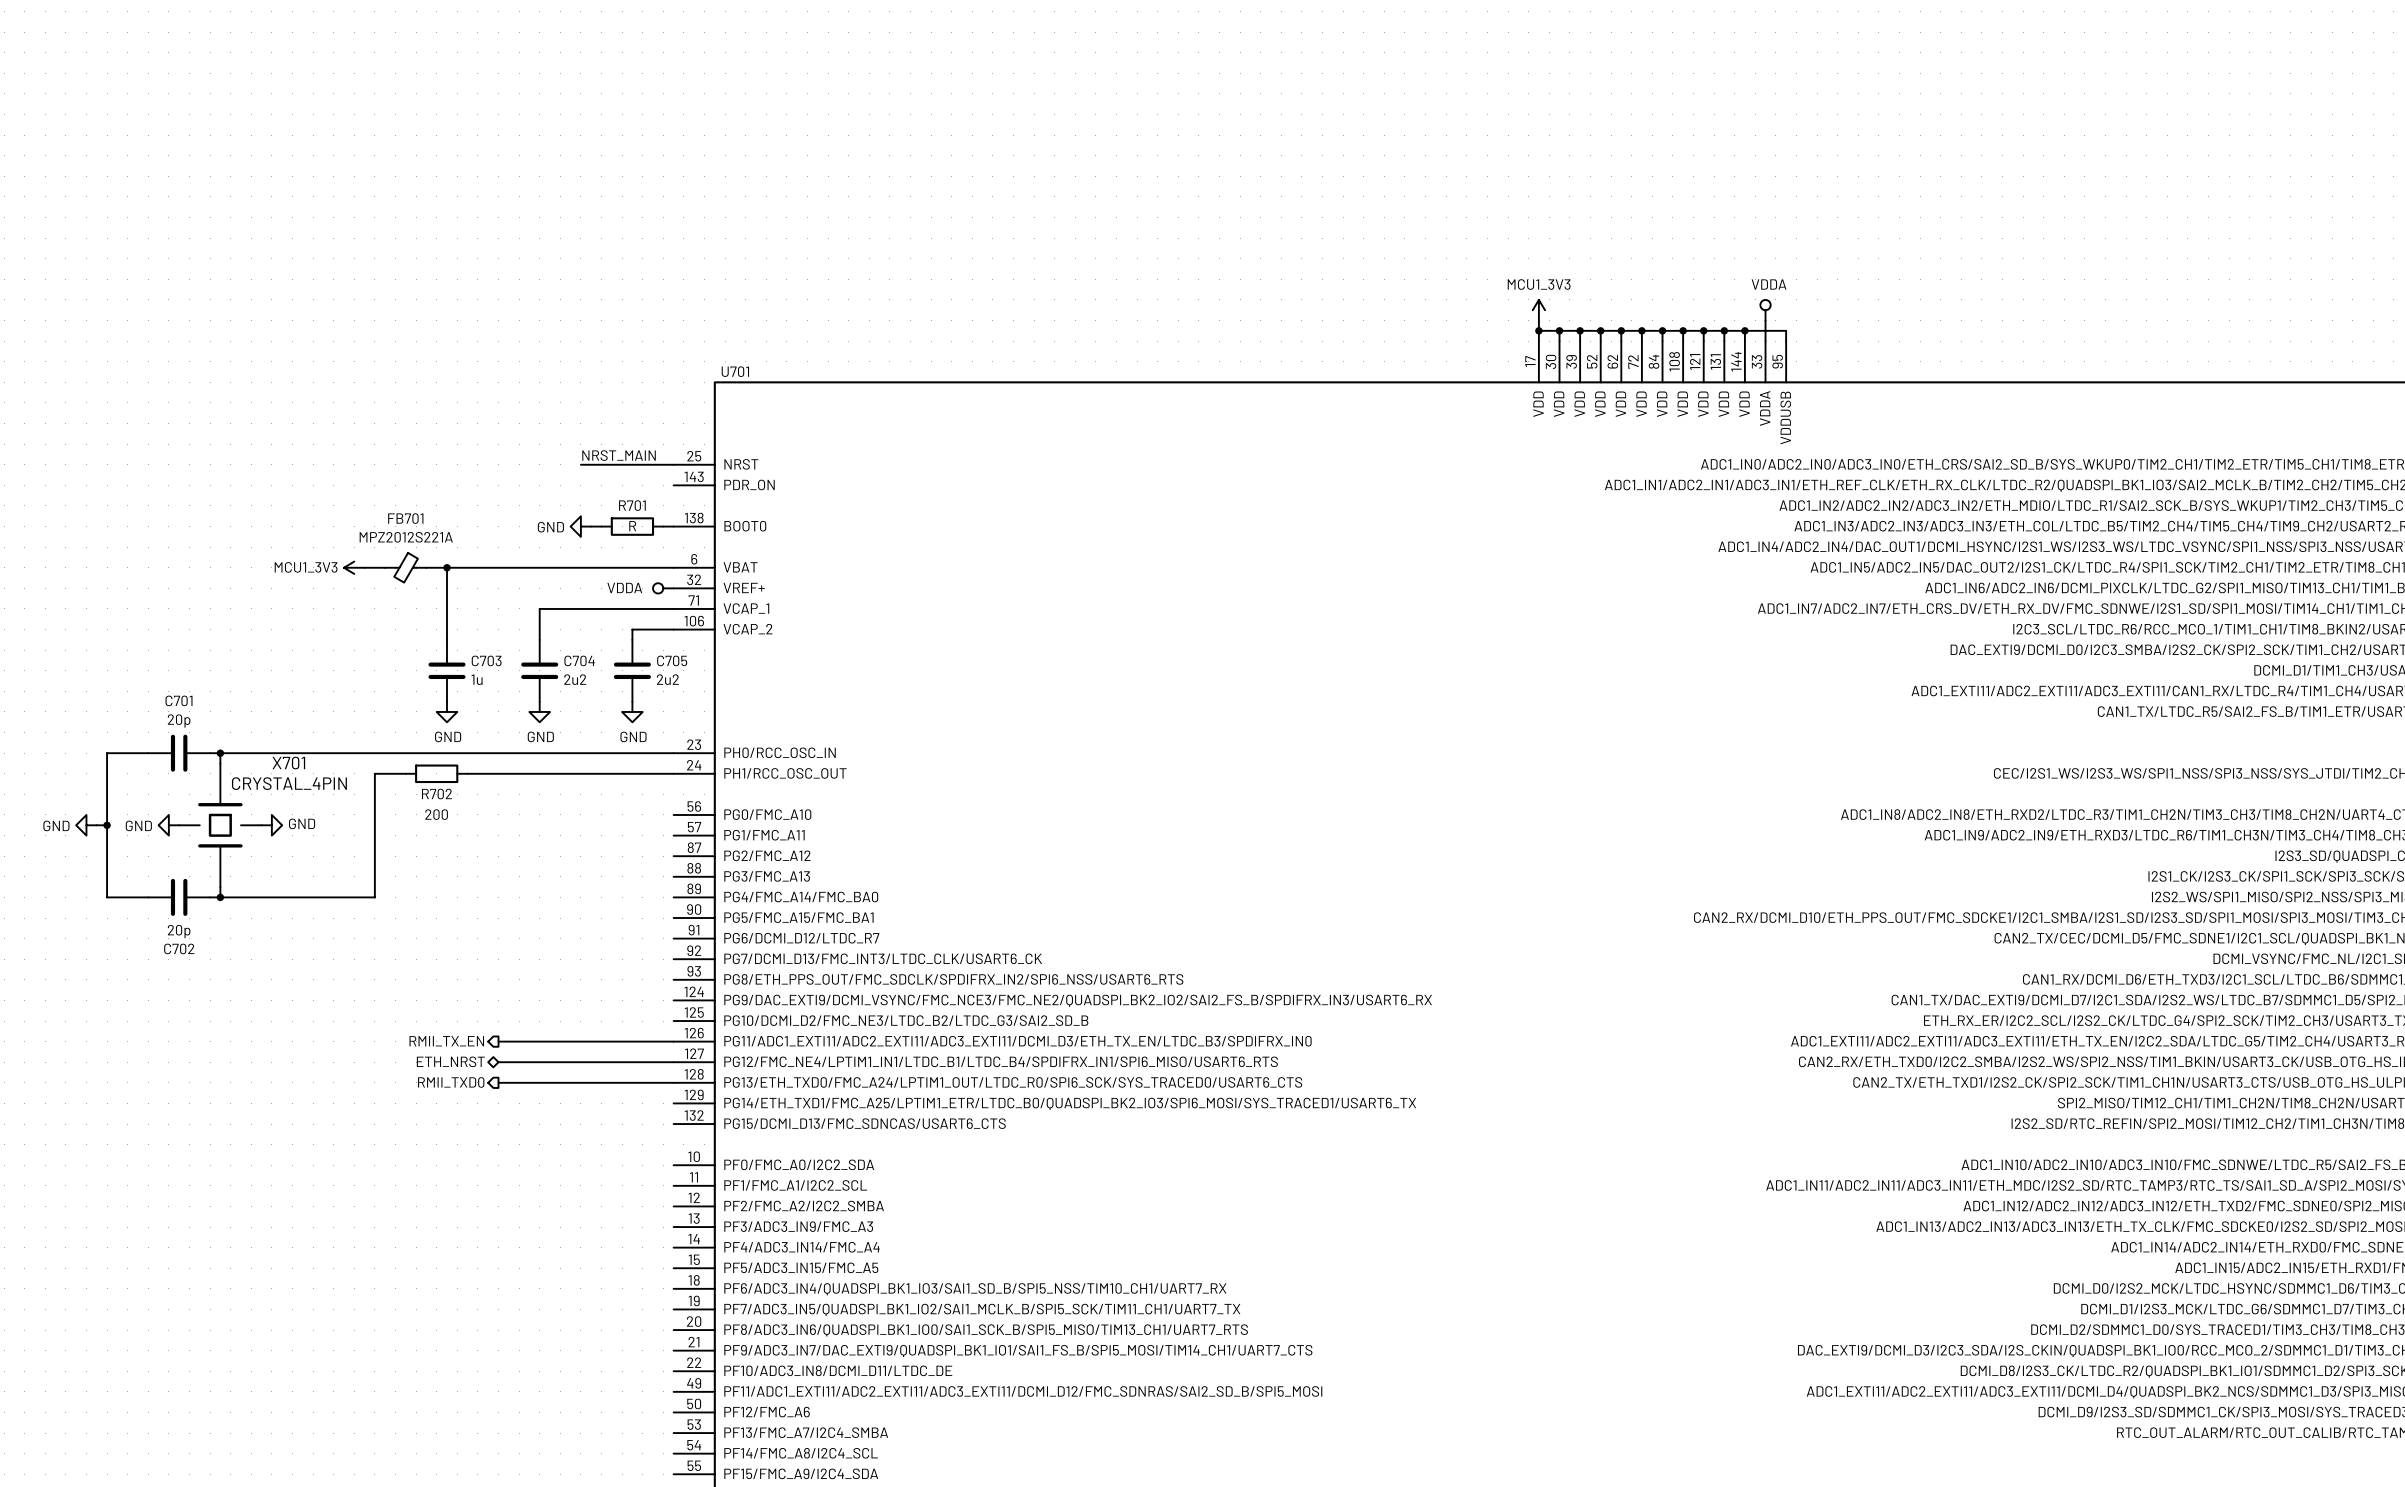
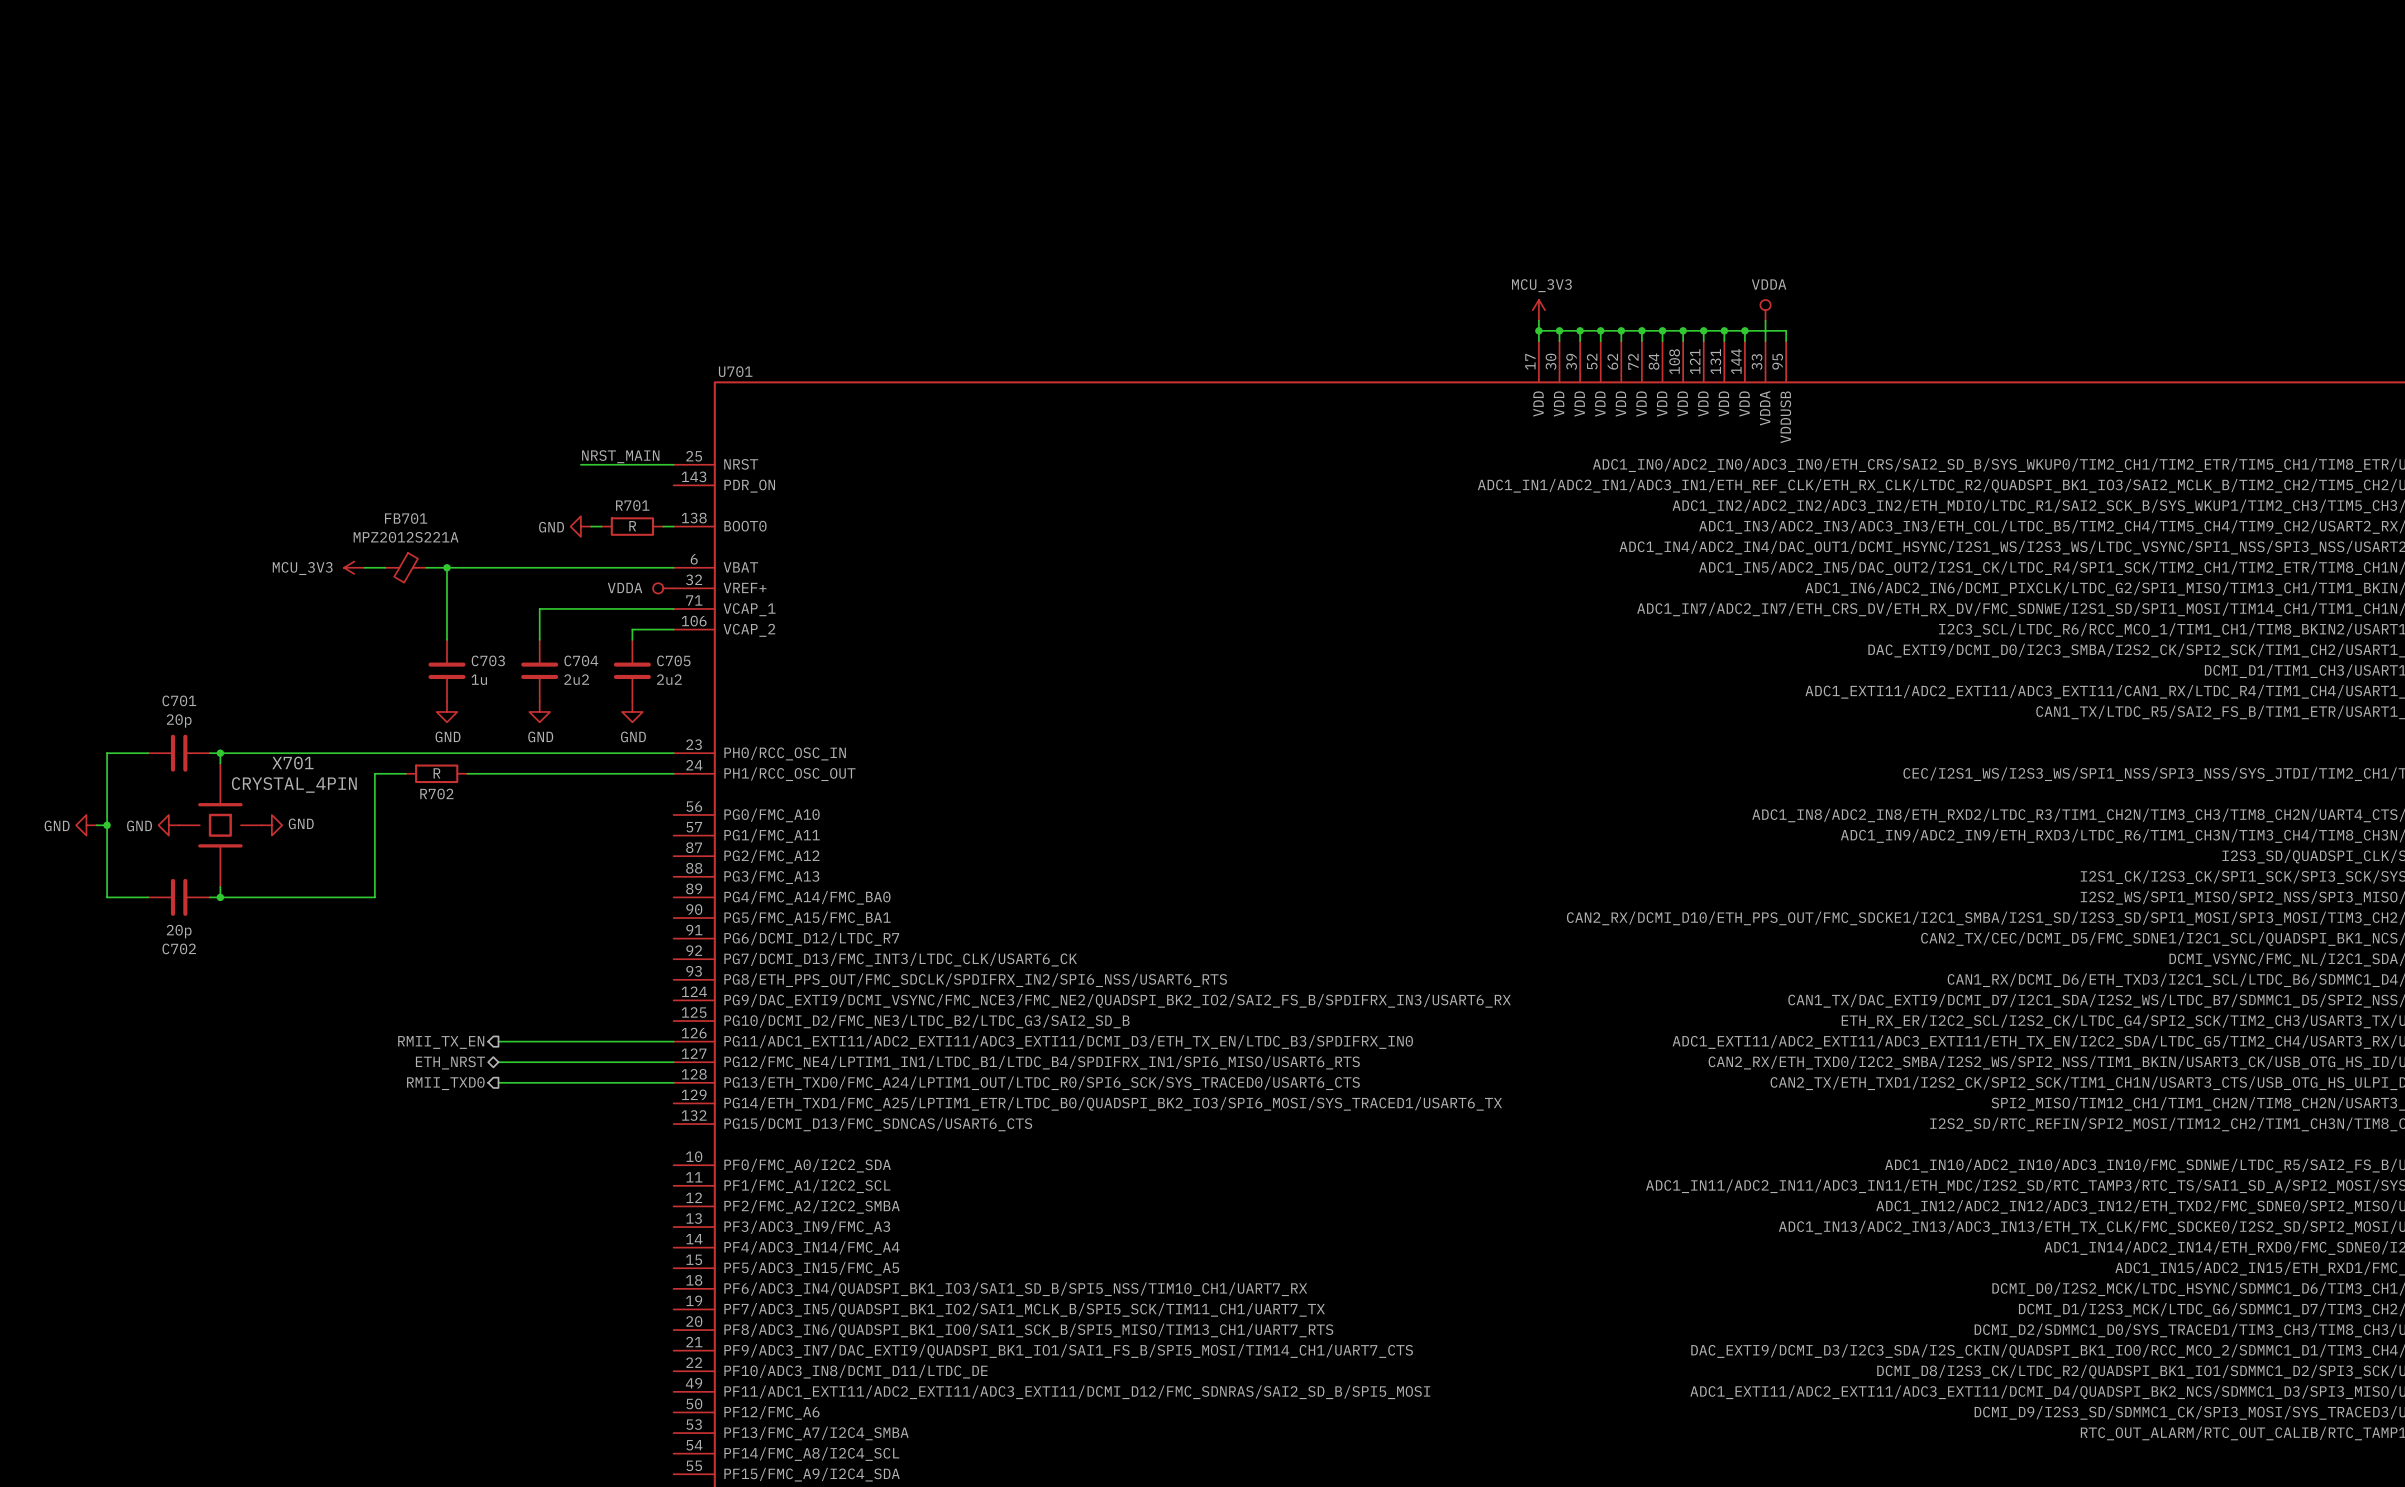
power symbol: MCU1_3V3 (1538, 310) -> MCU_3V3 (1538, 310)
power symbol: MCU1_3V3 (354, 567) -> MCU_3V3 (354, 567)
R702 value: 200 (436, 814) -> R (436, 773)

